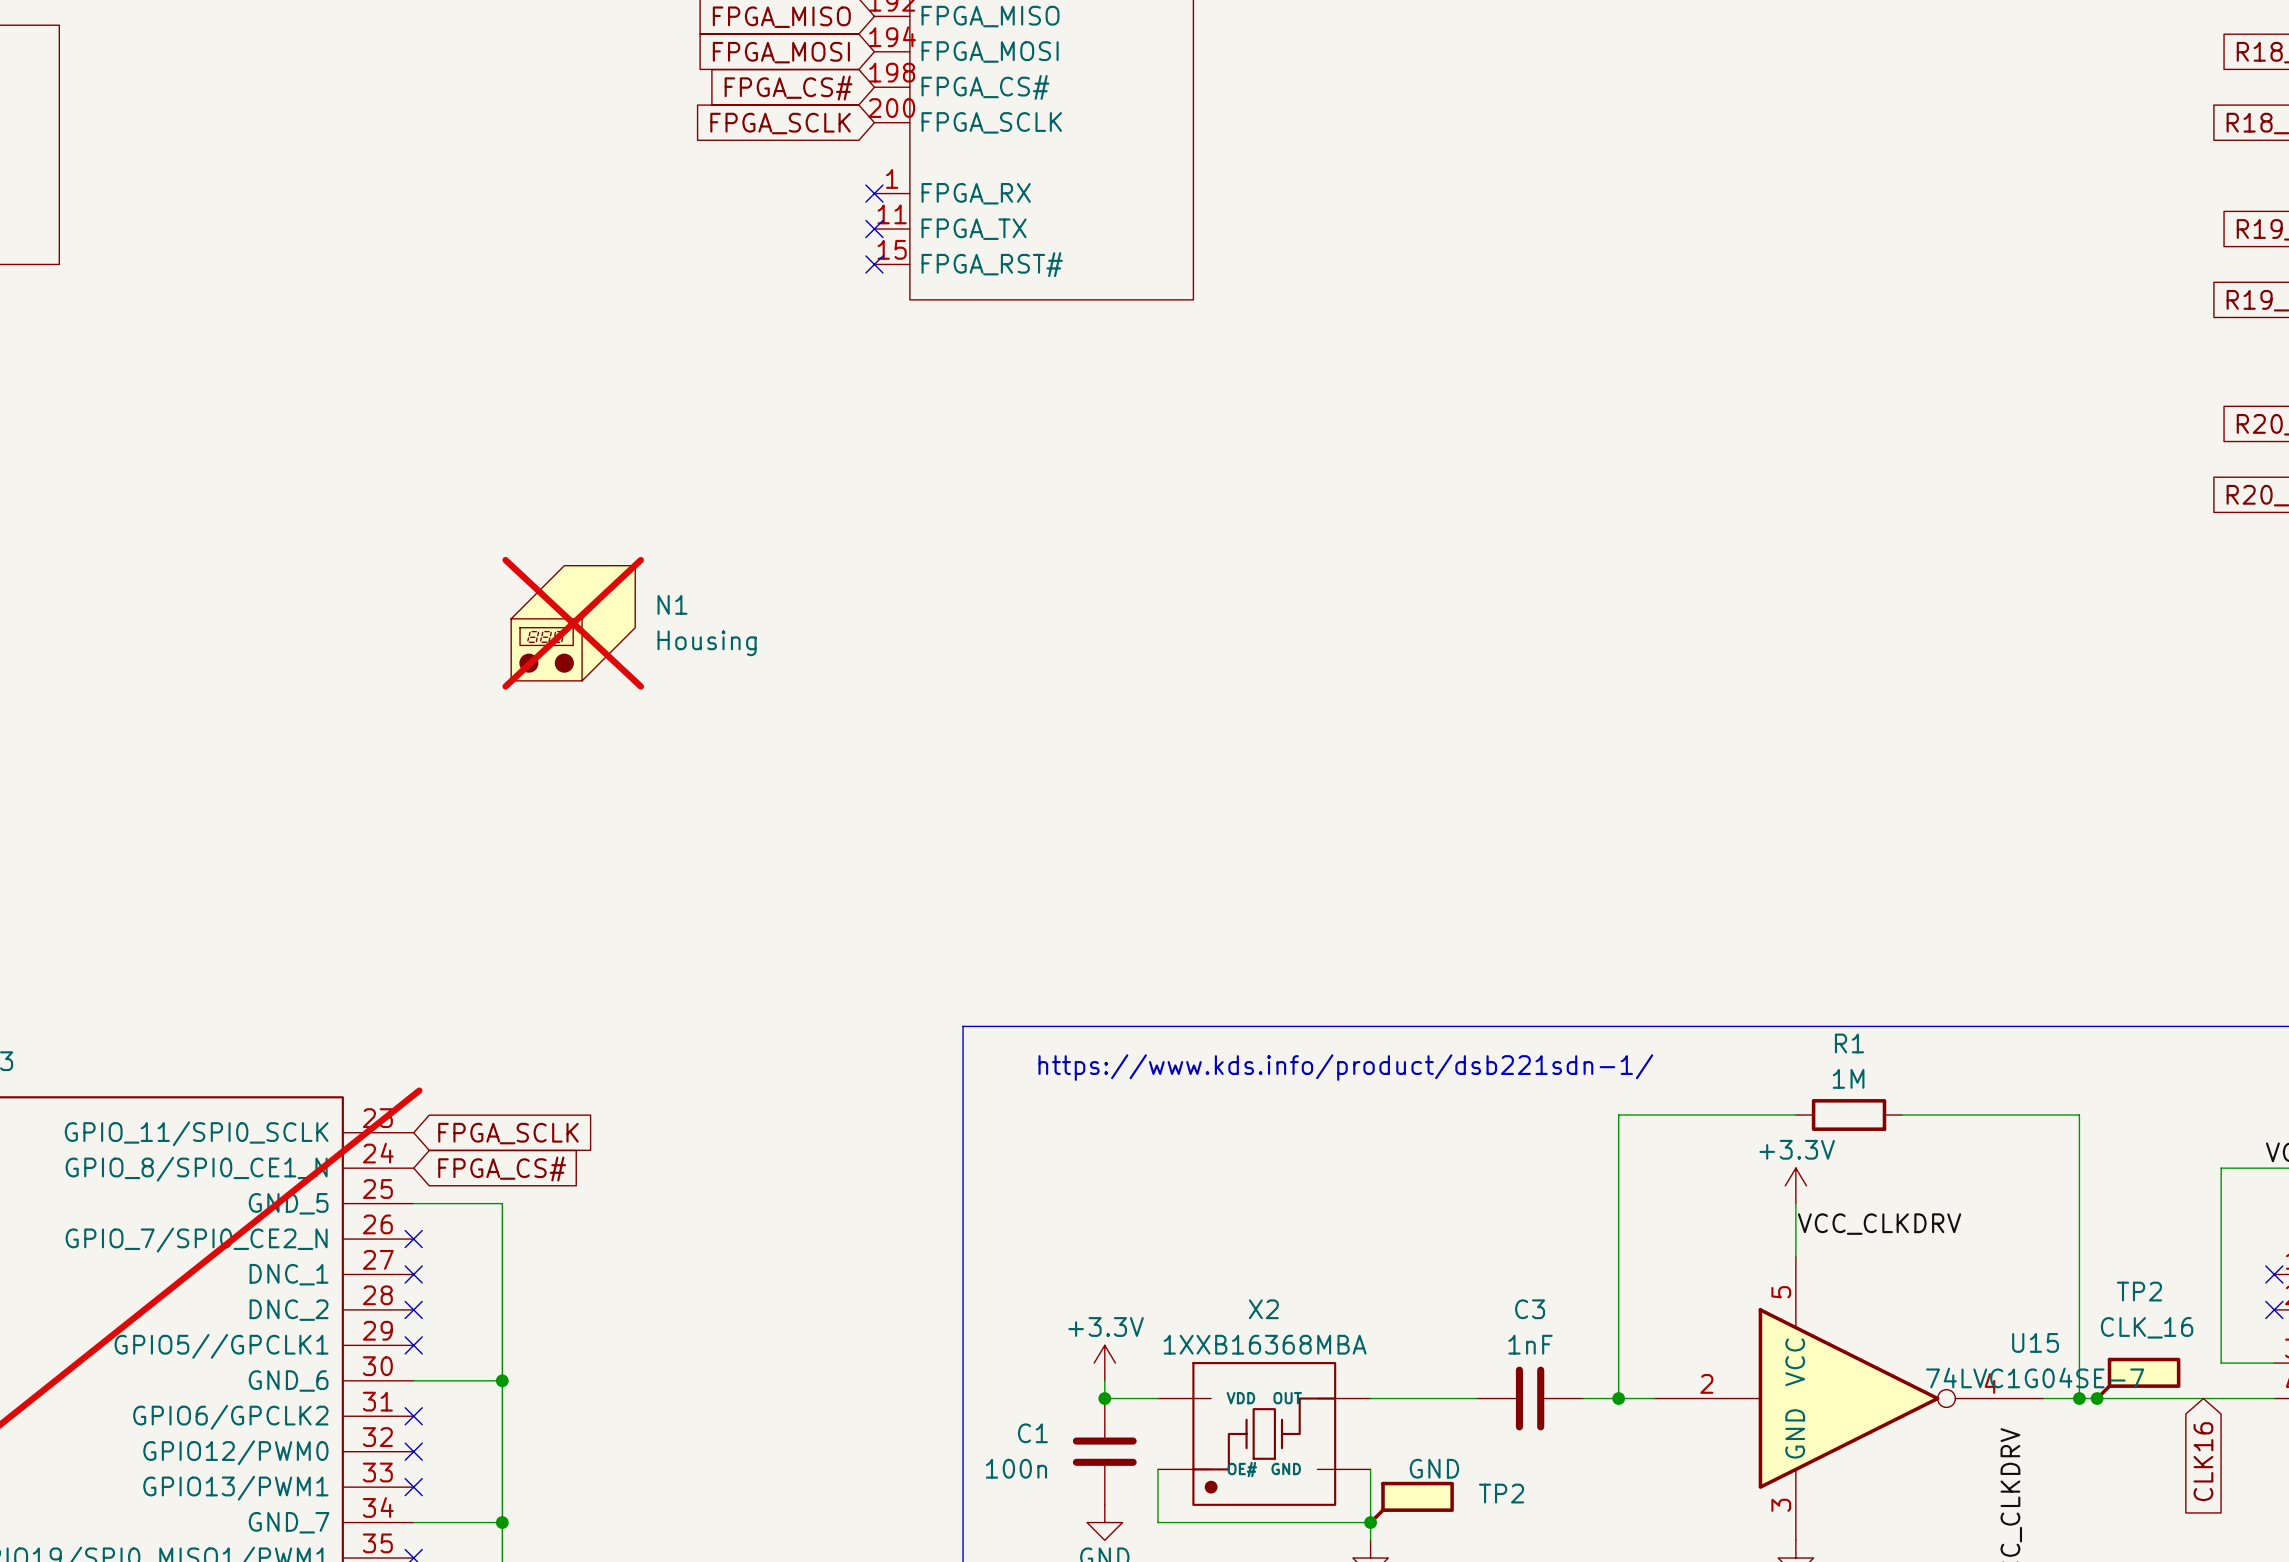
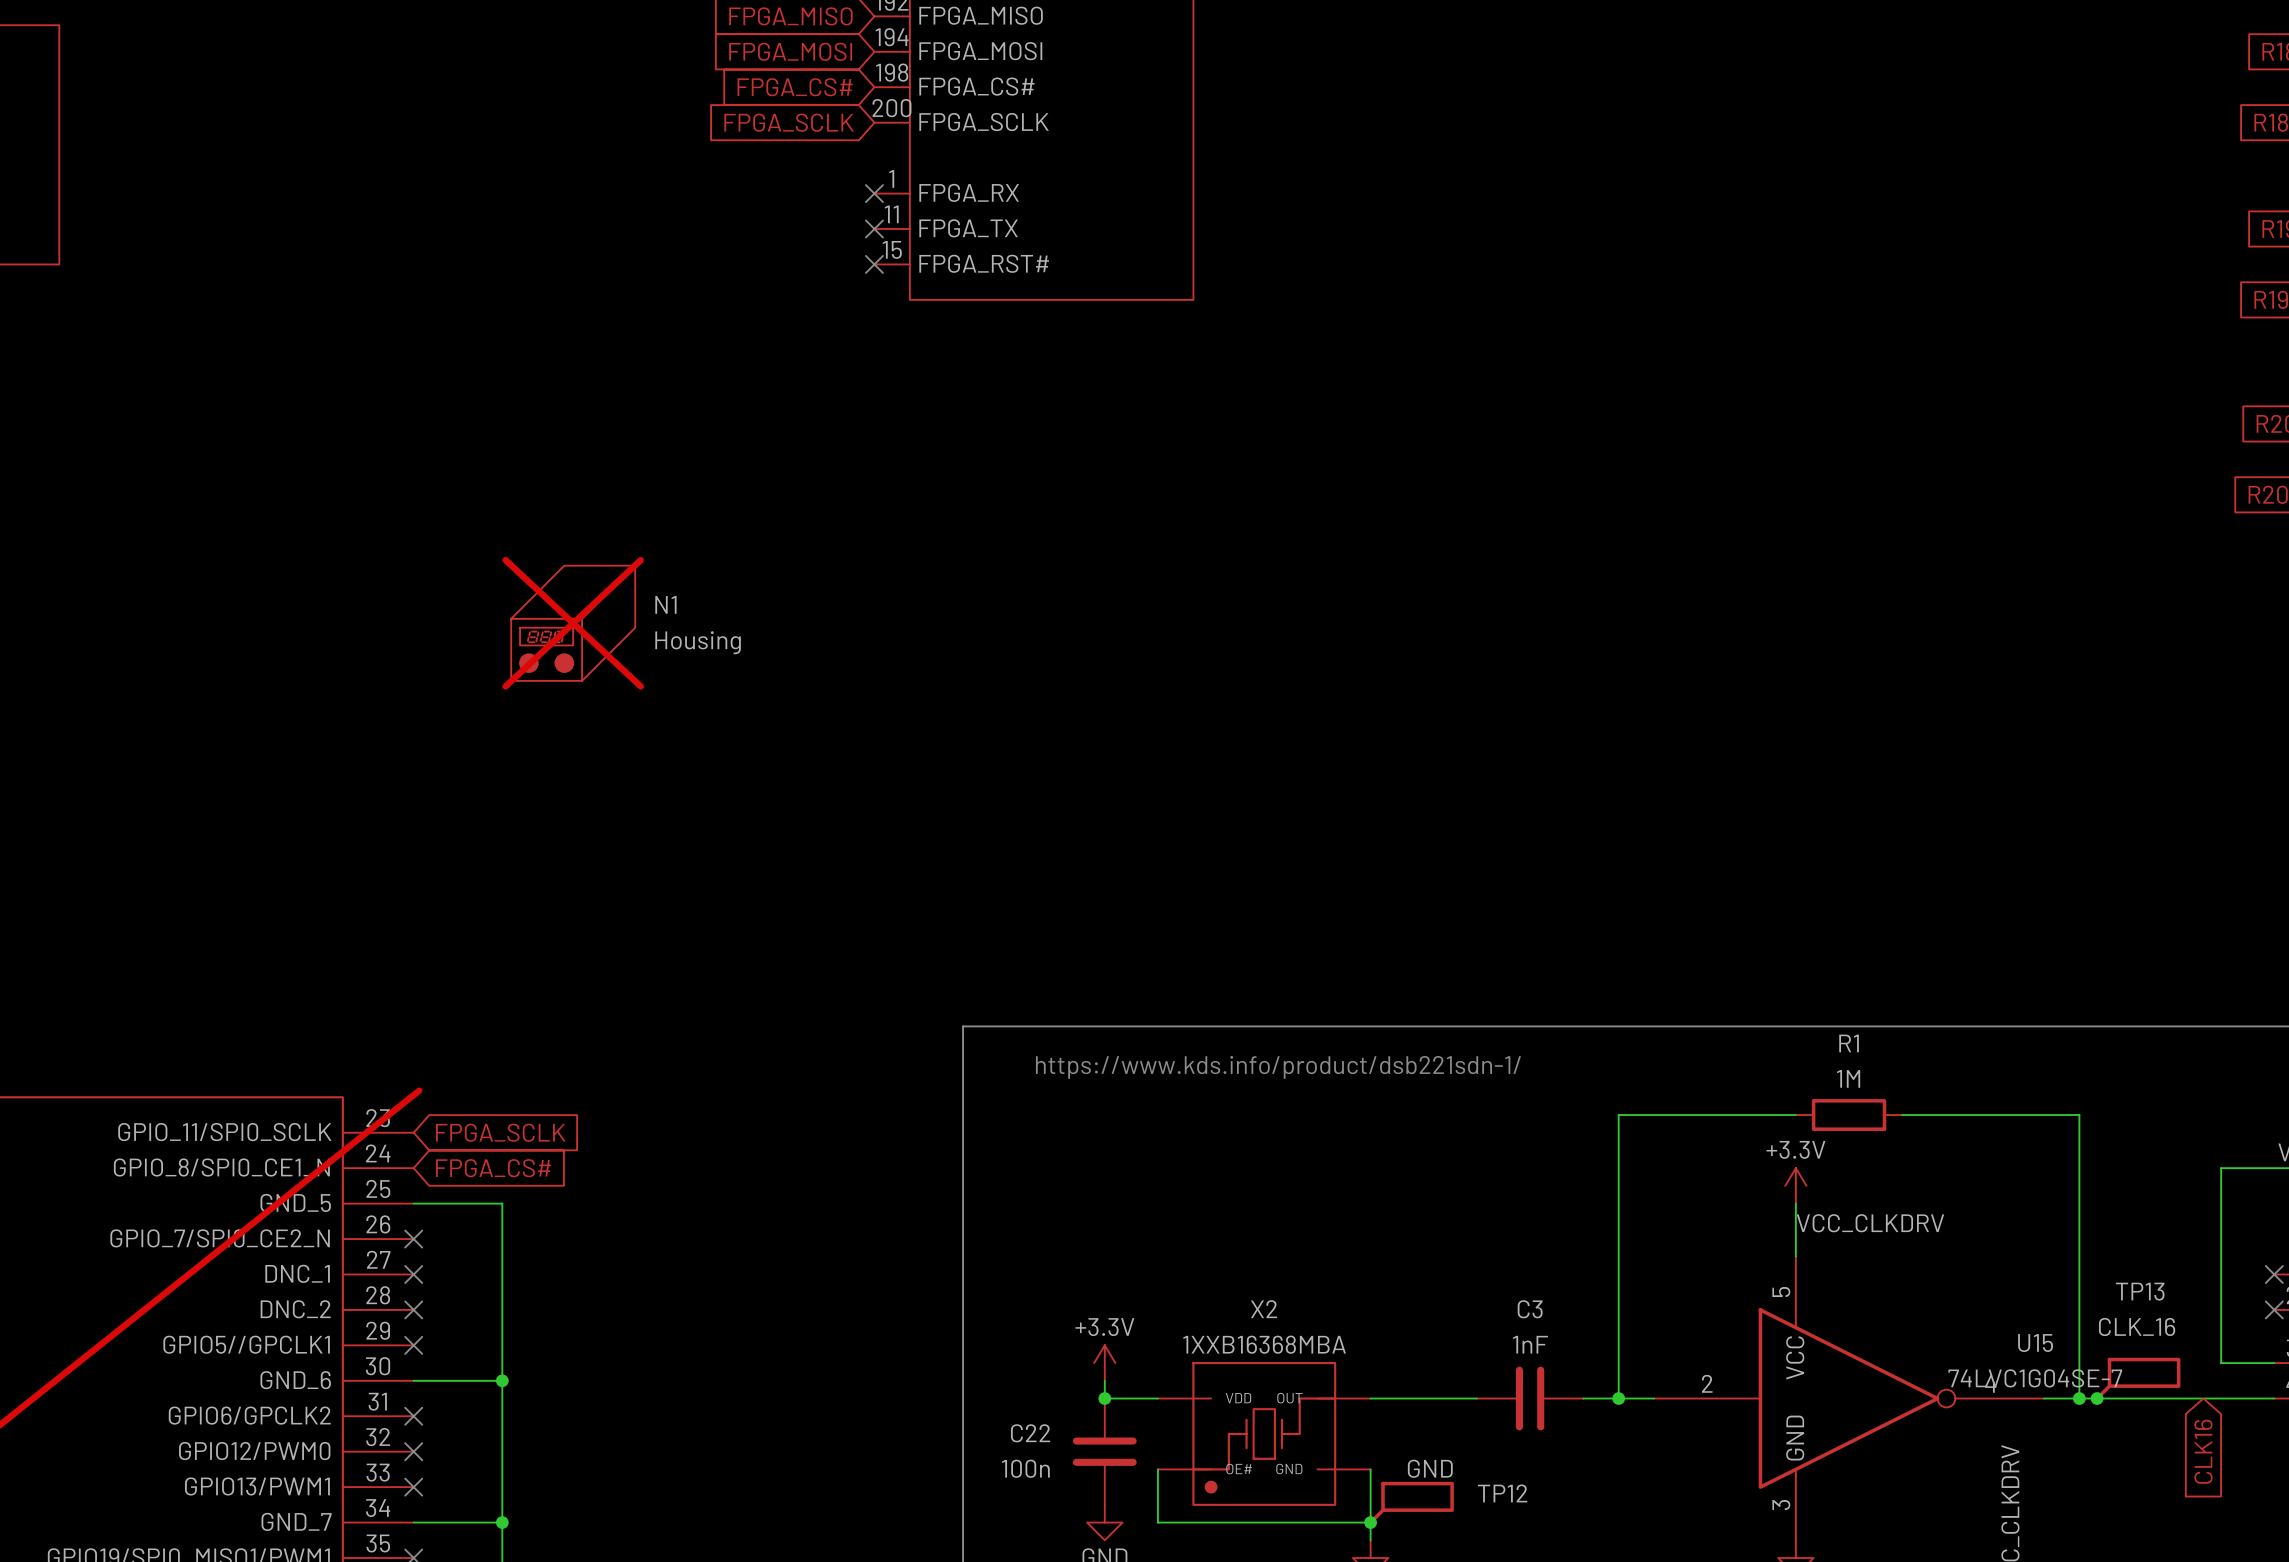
TP2 name: TP2 (2139, 1291) -> TP13 (2140, 1291)
C1 name: C1 (1032, 1433) -> C22 (1030, 1433)
TP2 name: TP2 (1501, 1493) -> TP12 (1502, 1493)

